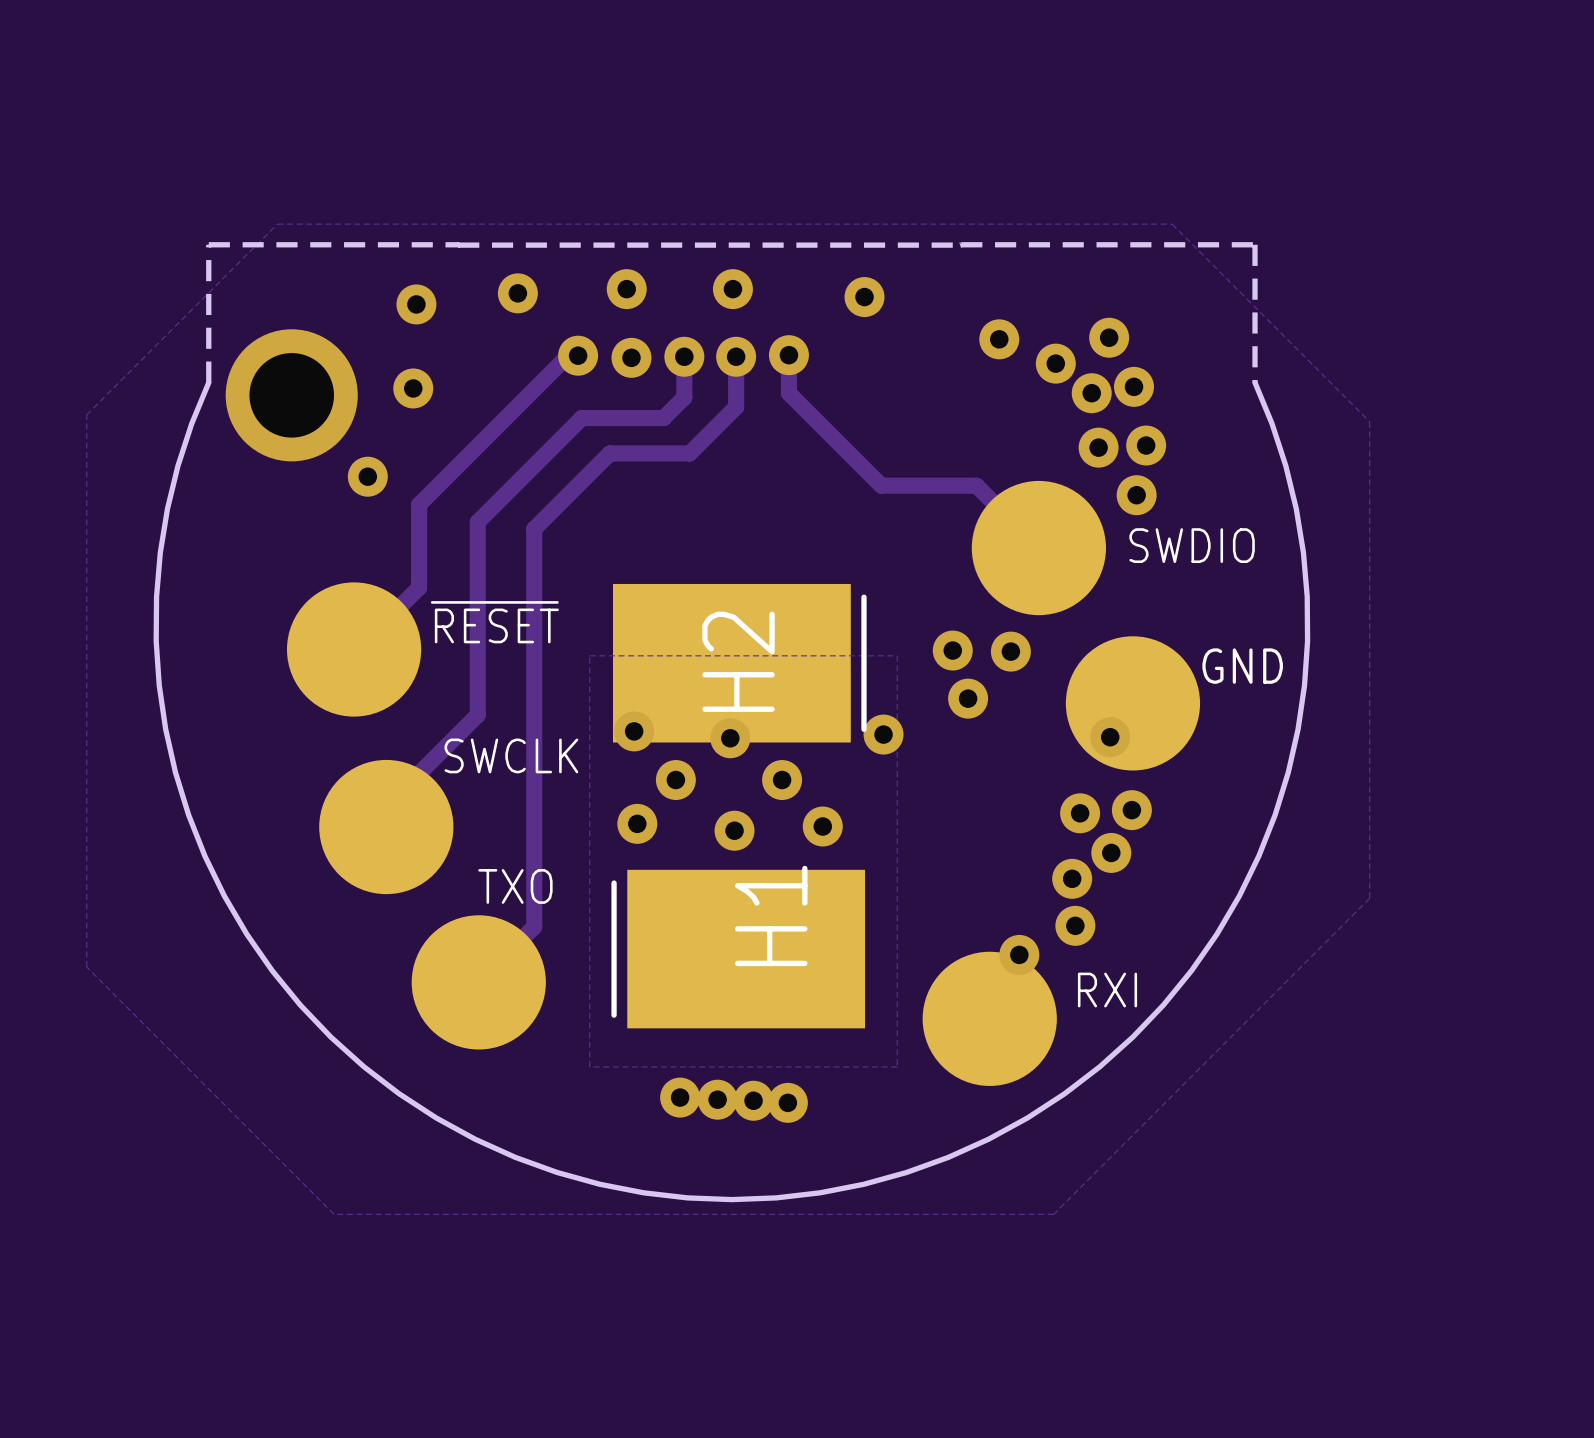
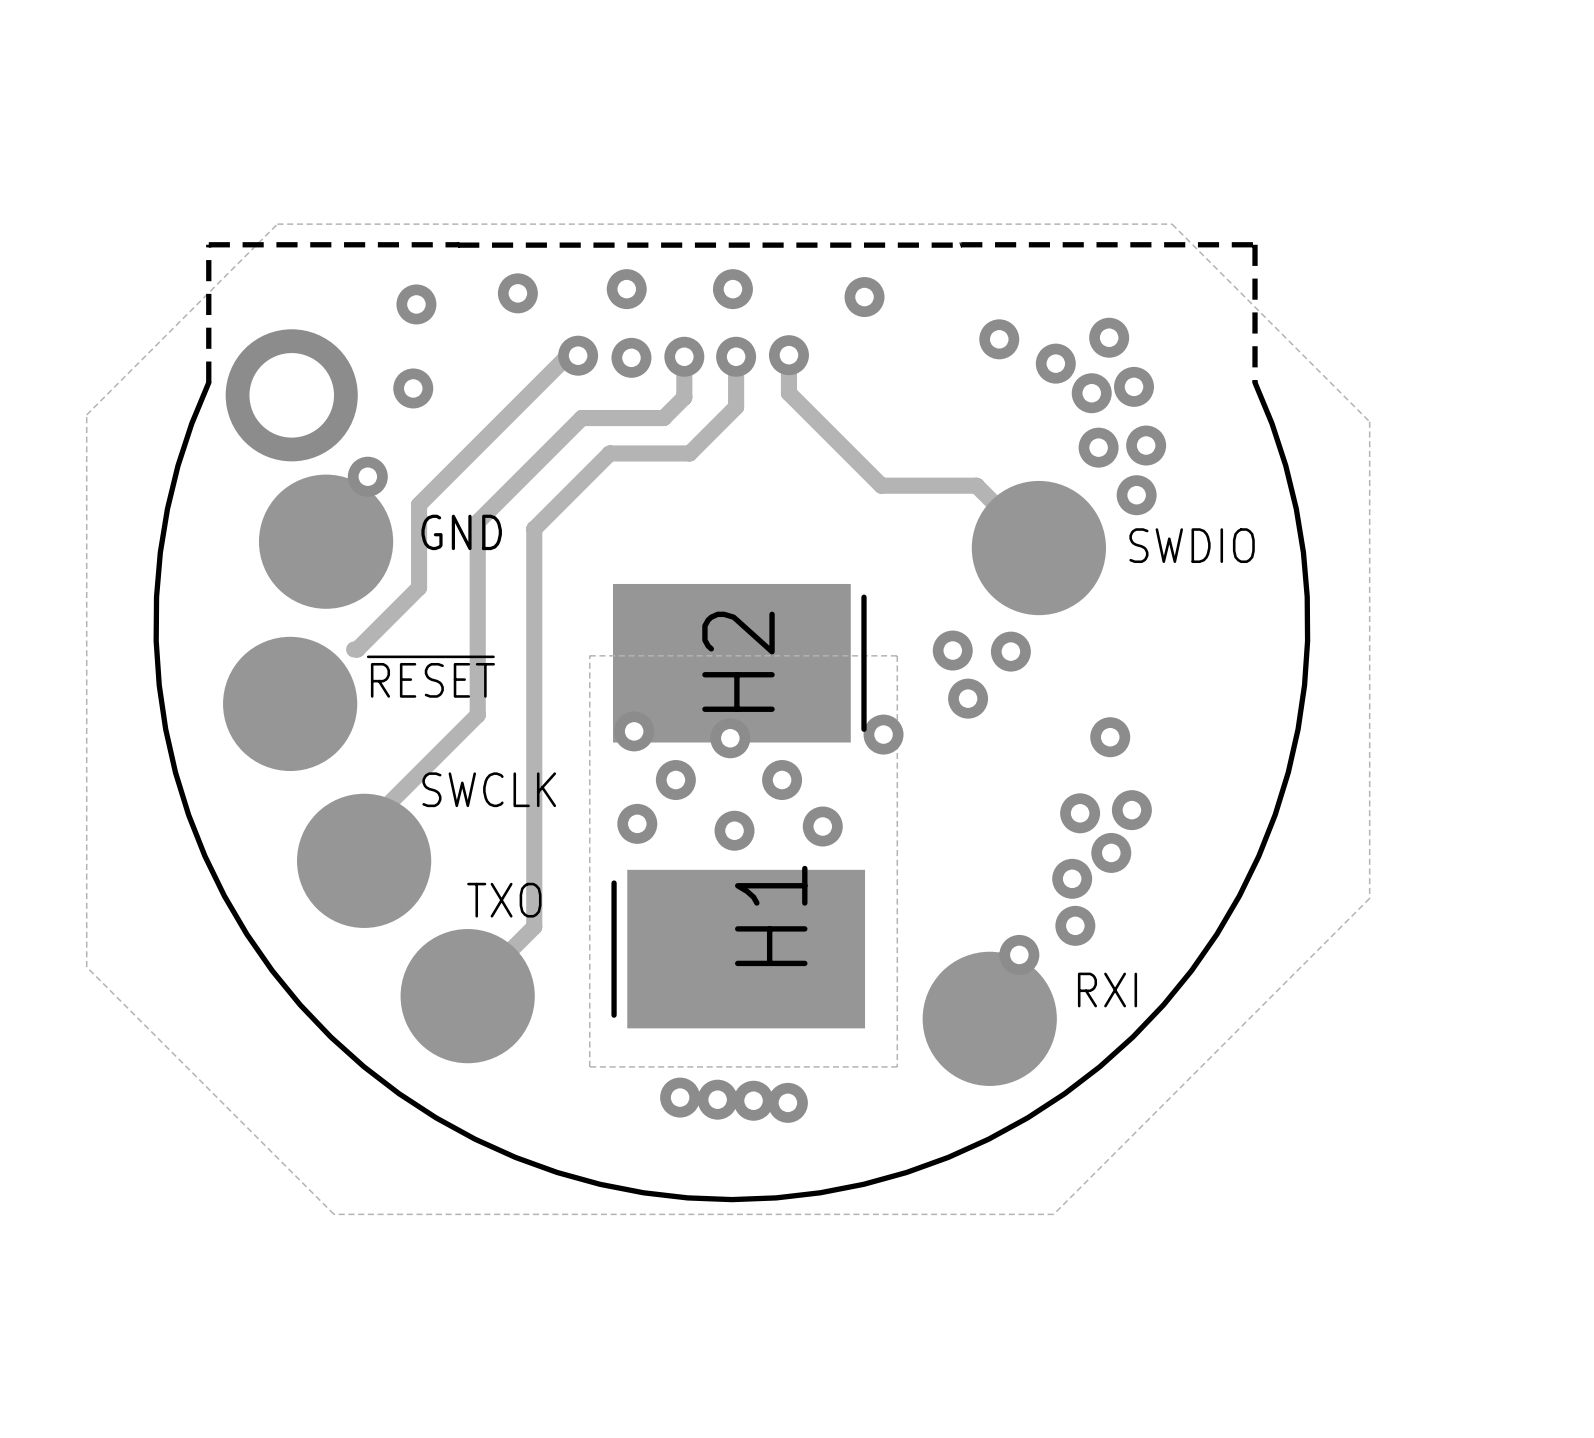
~{RESET} position: (354, 649) -> (290, 703)
GND name position: GND (1242, 666) -> GND (461, 532)
GND position: (1132, 703) -> (326, 541)
SWCLK position: (386, 827) -> (364, 860)
TXO position: (478, 982) -> (467, 996)

